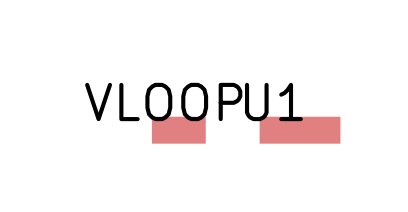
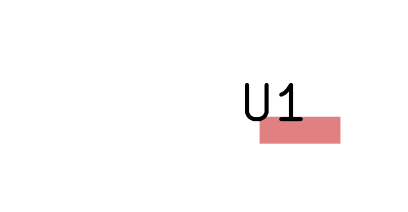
VLOOP: (178, 130) -> none

